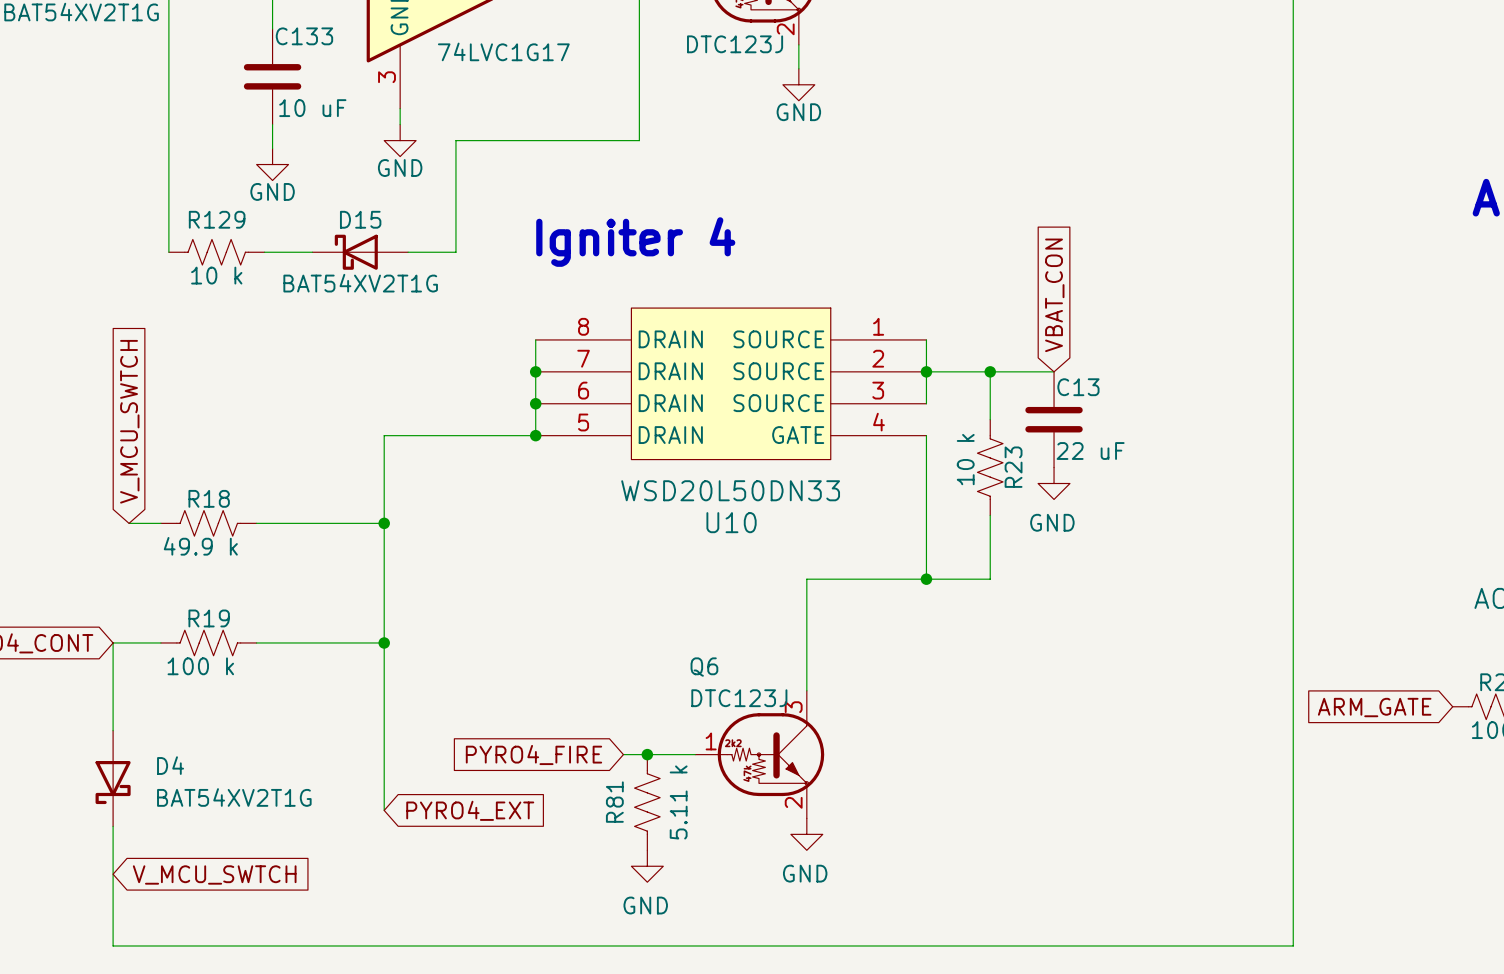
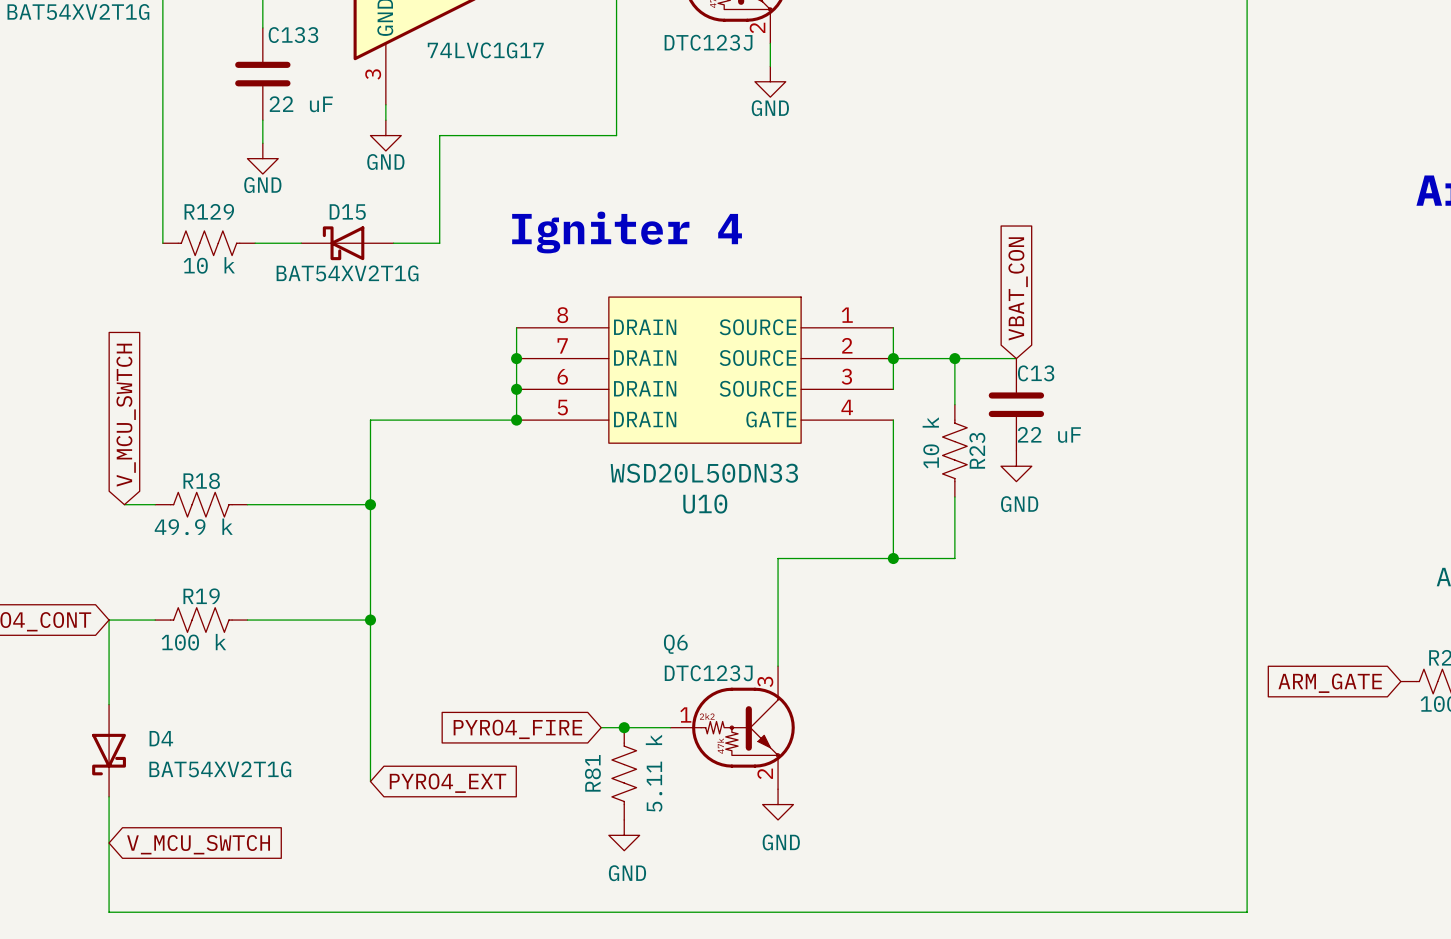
C133 value: 10 uF (312, 108) -> 22 uF (301, 104)

